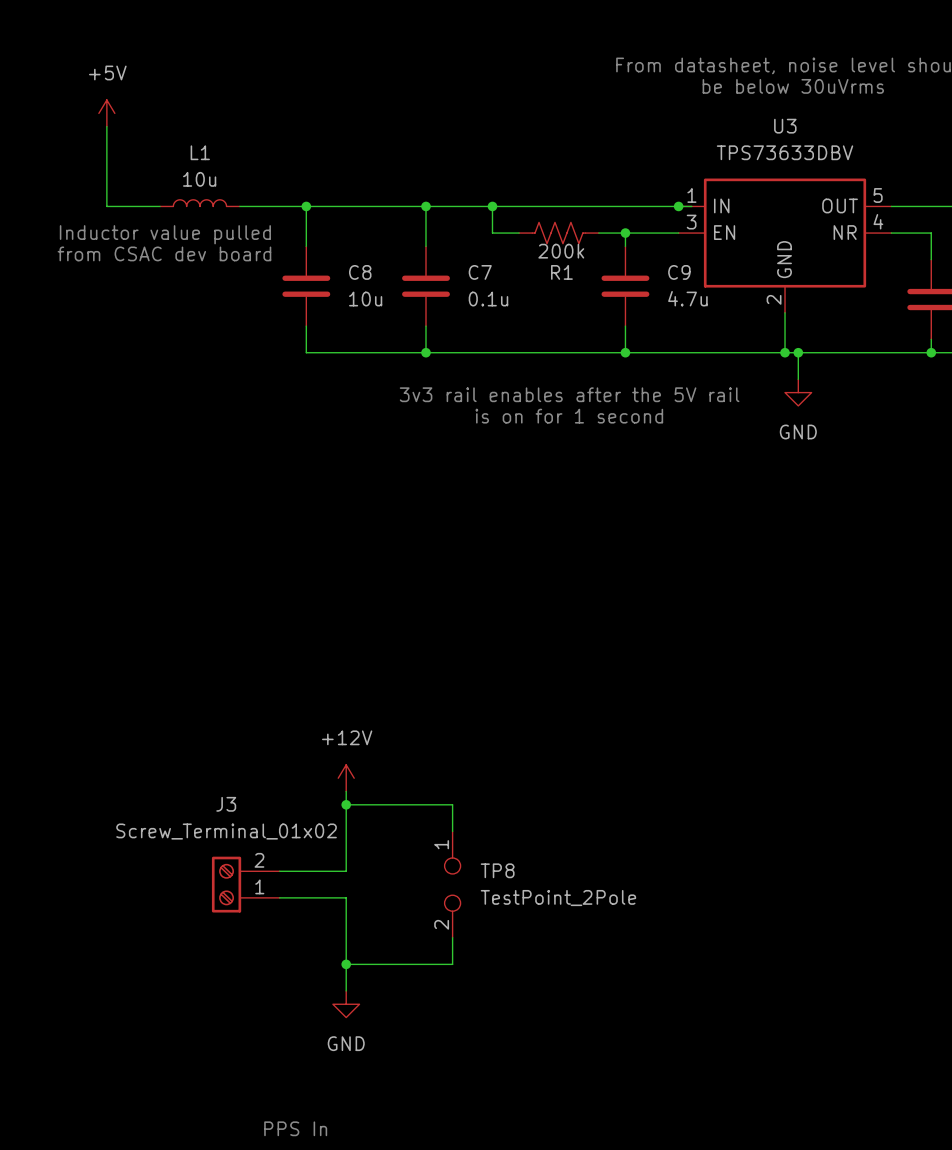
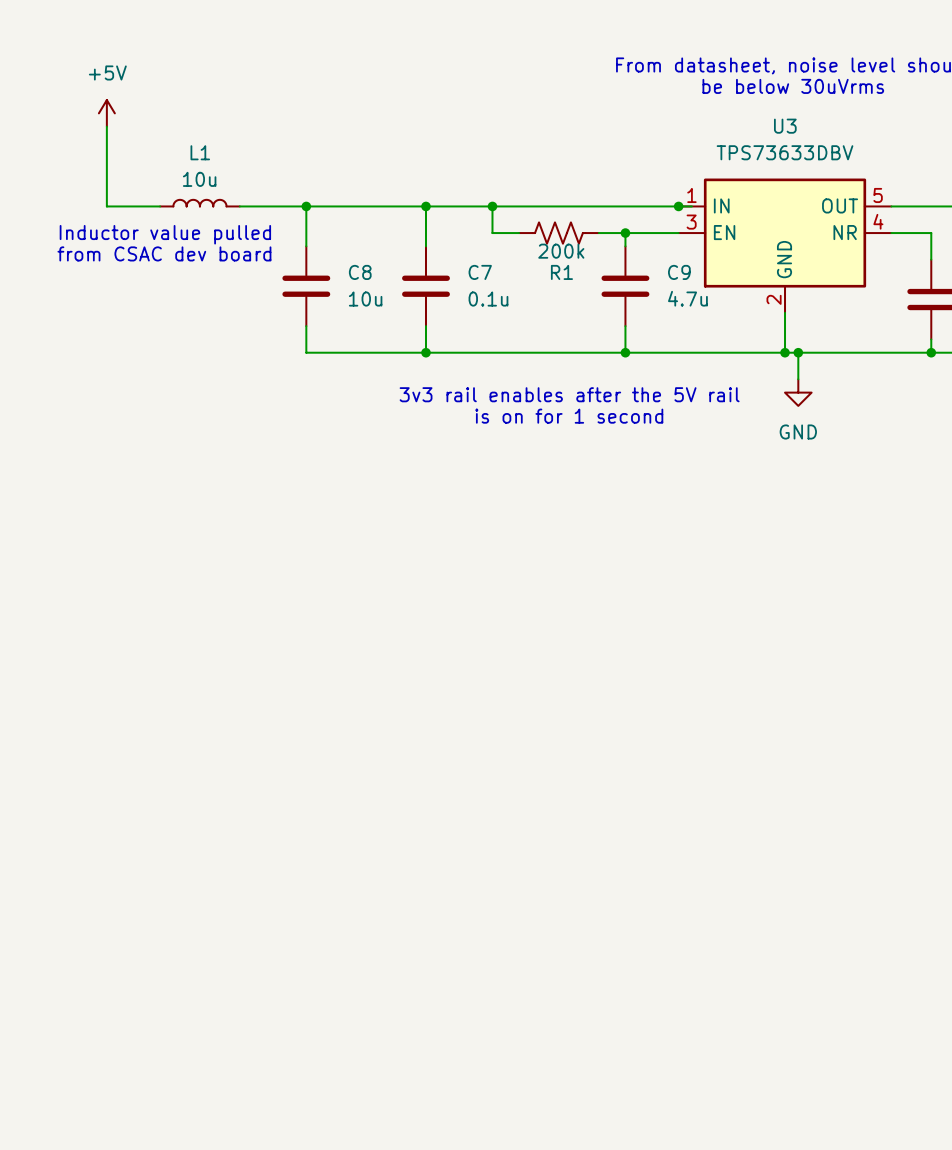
power symbol: +12V (346, 778) -> none
wire: (346, 791) (346, 871) (279, 871) -> none
wire: (346, 804) (452, 804) (452, 831) -> none
junction: (346, 804) -> none
J3: Screw_Terminal_01x02 (245, 884) -> none
TP8: TestPoint_2Pole (452, 884) -> none
wire: (279, 897) (346, 897) (346, 990) -> none
wire: (452, 937) (452, 964) (346, 964) -> none
junction: (346, 964) -> none
power symbol: GND (346, 1004) -> none
text: PPS In (295, 1128) -> none

